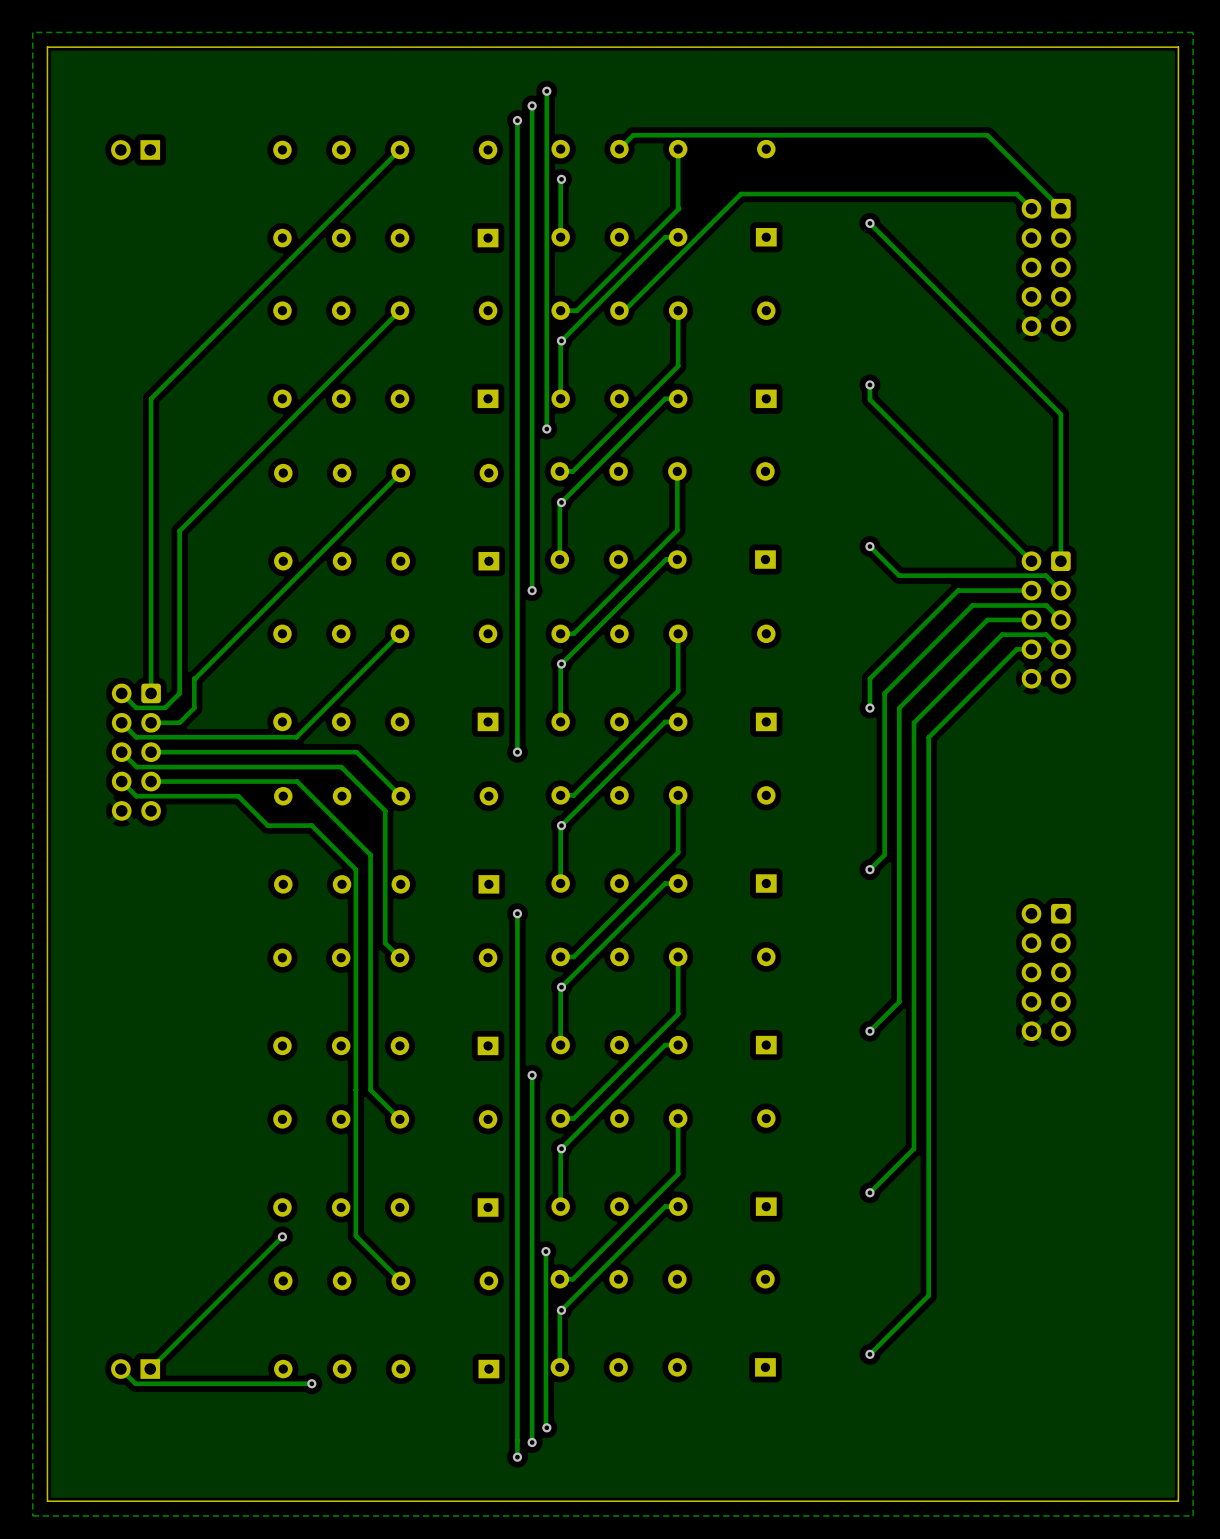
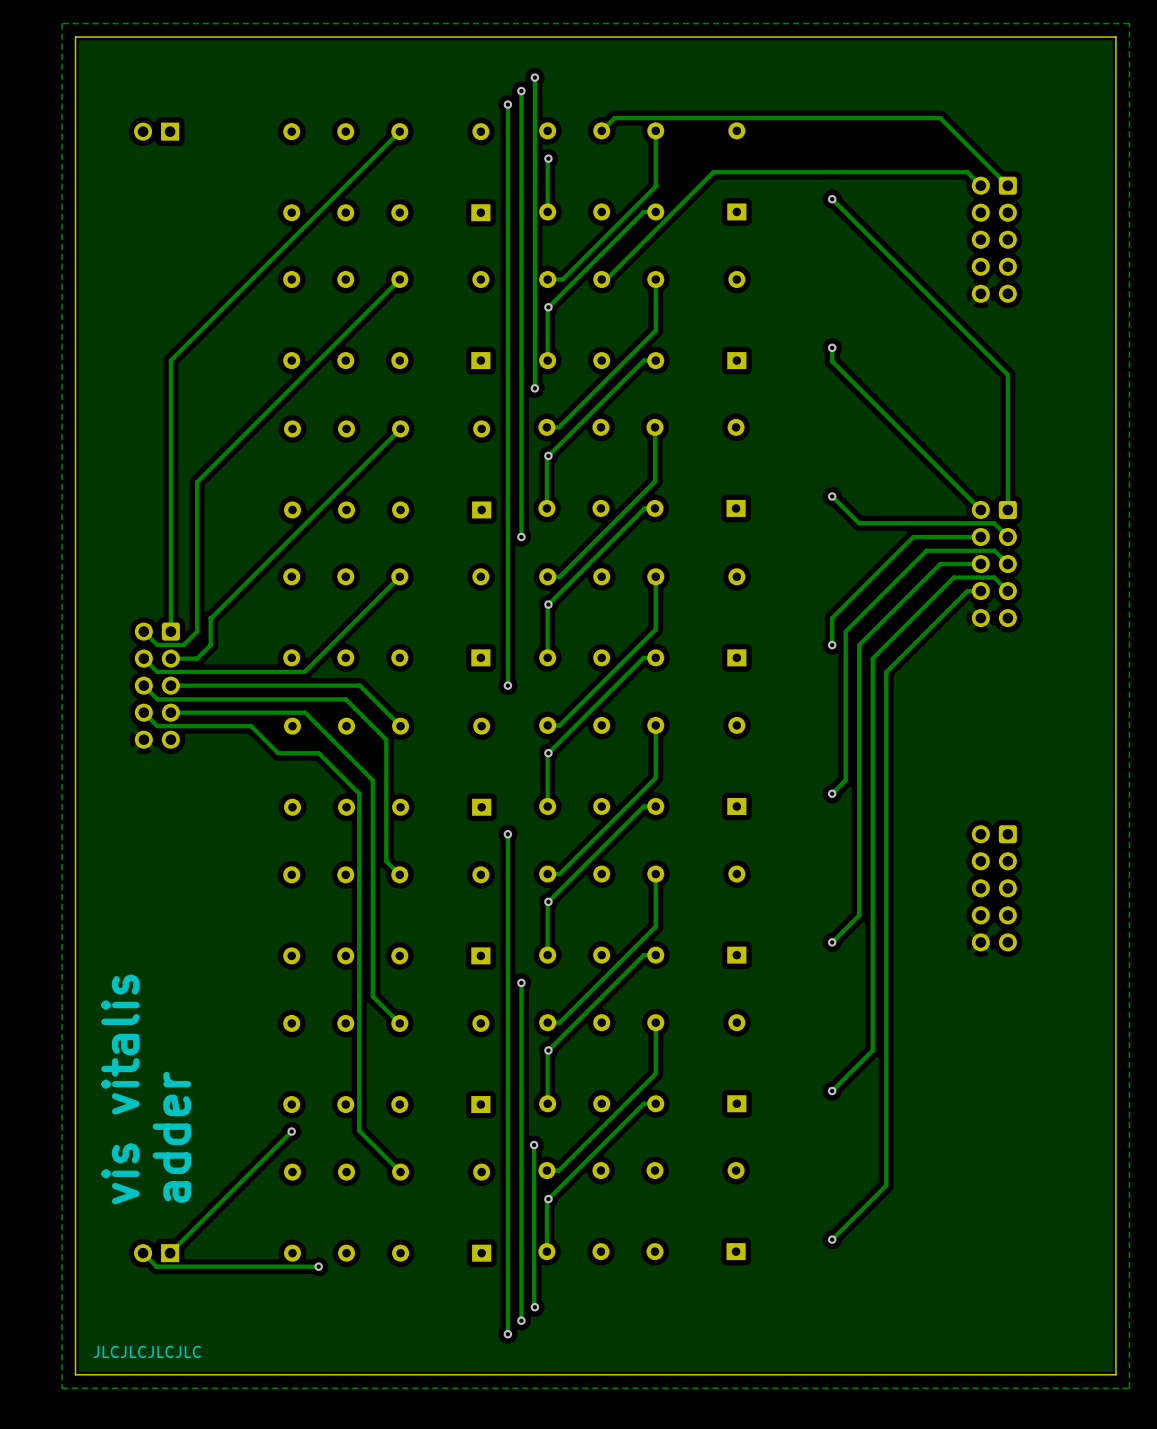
text: none -> vis vitalis (120, 1089)
text: none -> adder (171, 1137)
text: none -> JLCJLCJLCJLC (147, 1351)

